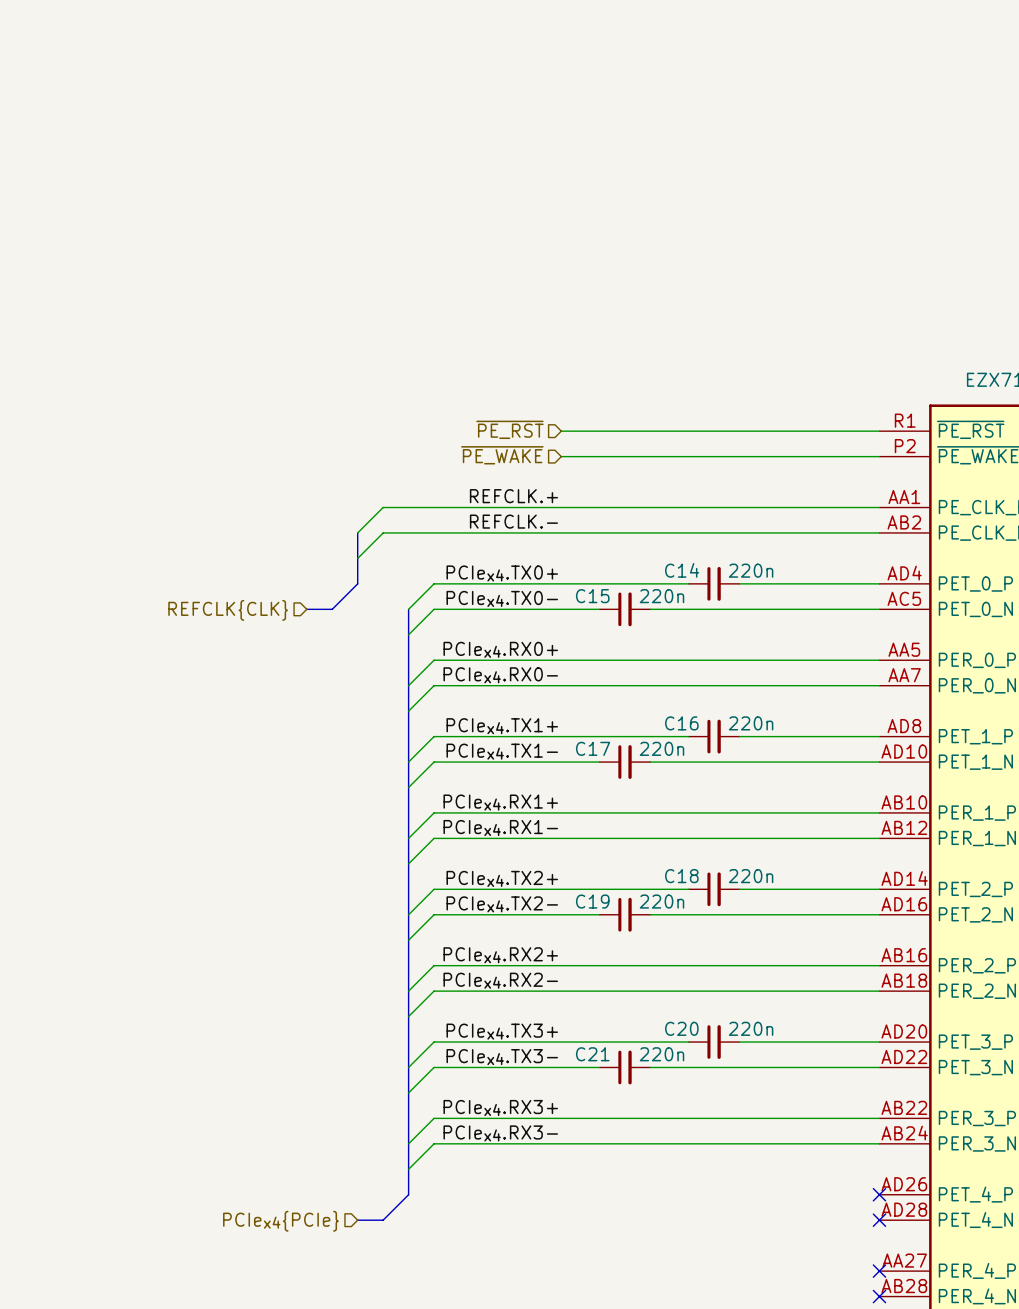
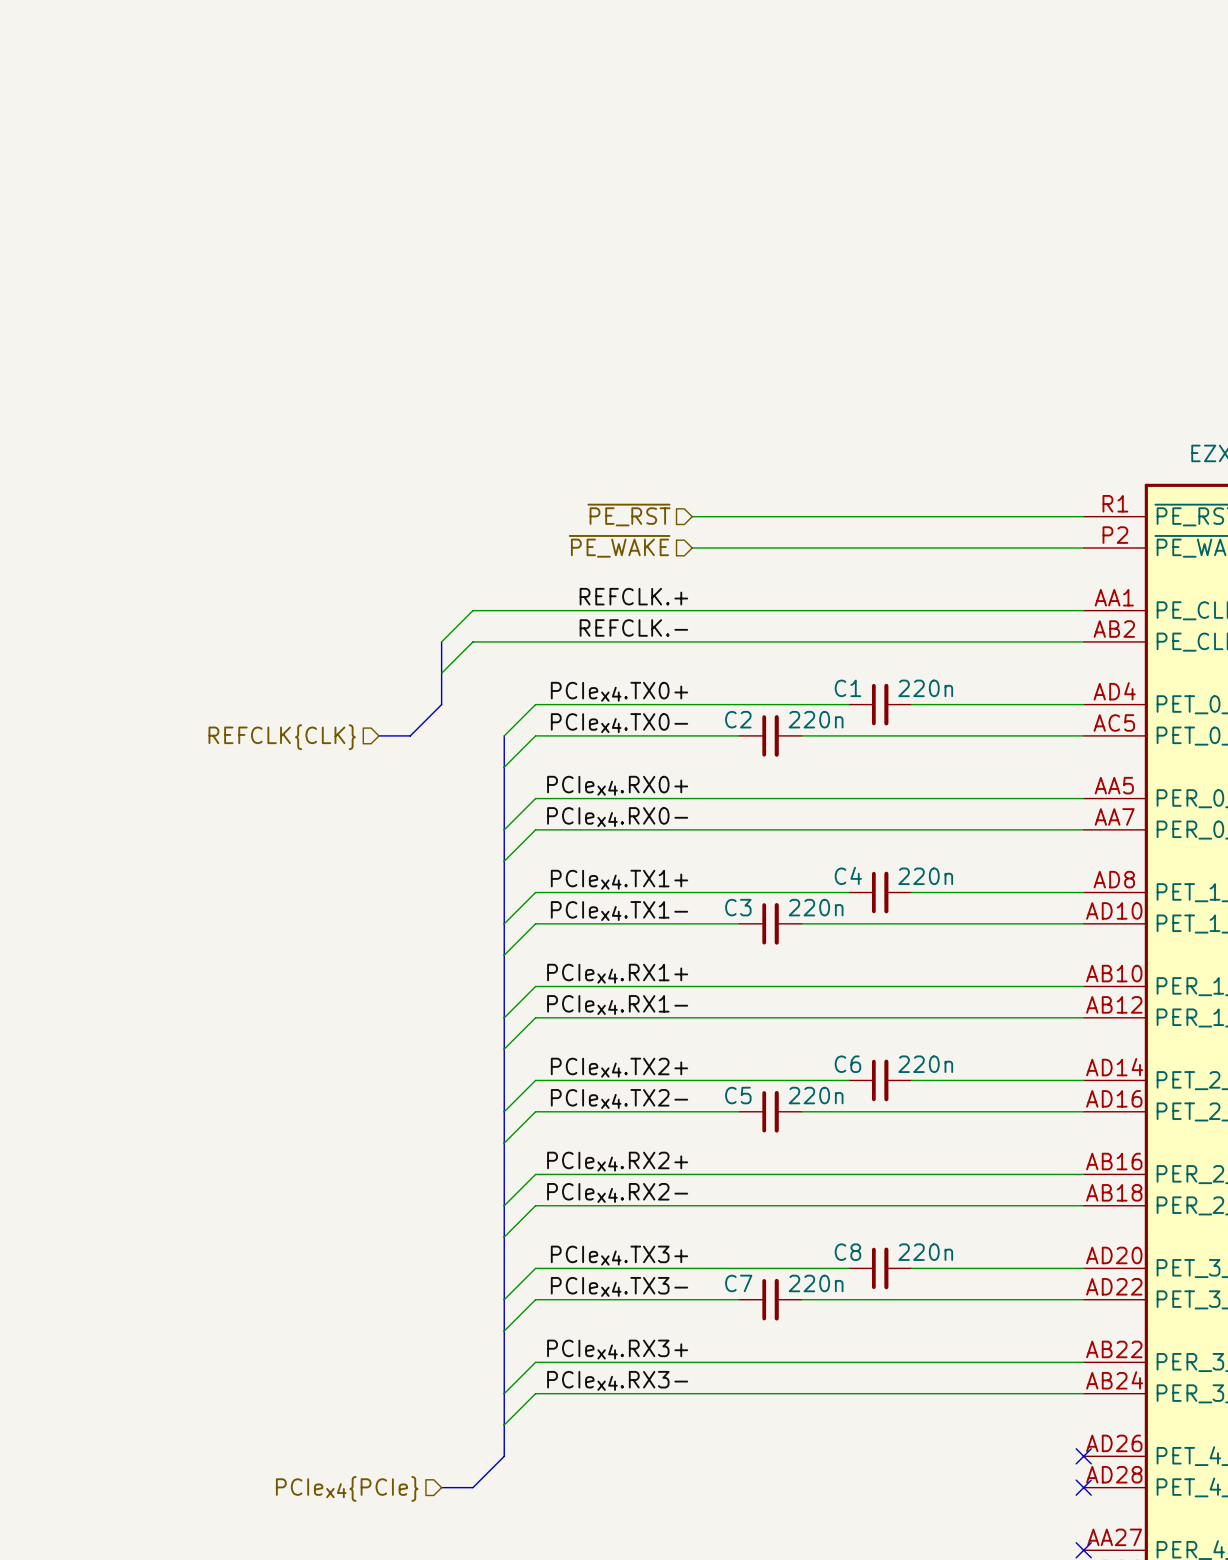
C14 name: C14 (682, 570) -> C1 (847, 688)
C15 name: C15 (592, 596) -> C2 (738, 719)
C16 name: C16 (681, 723) -> C4 (848, 875)
C17 name: C17 (593, 748) -> C3 (738, 907)
C18 name: C18 (681, 876) -> C6 (847, 1064)
C19 name: C19 (592, 901) -> C5 (738, 1095)
C20 name: C20 (681, 1028) -> C8 (847, 1252)
C21 name: C21 (592, 1054) -> C7 (738, 1283)

